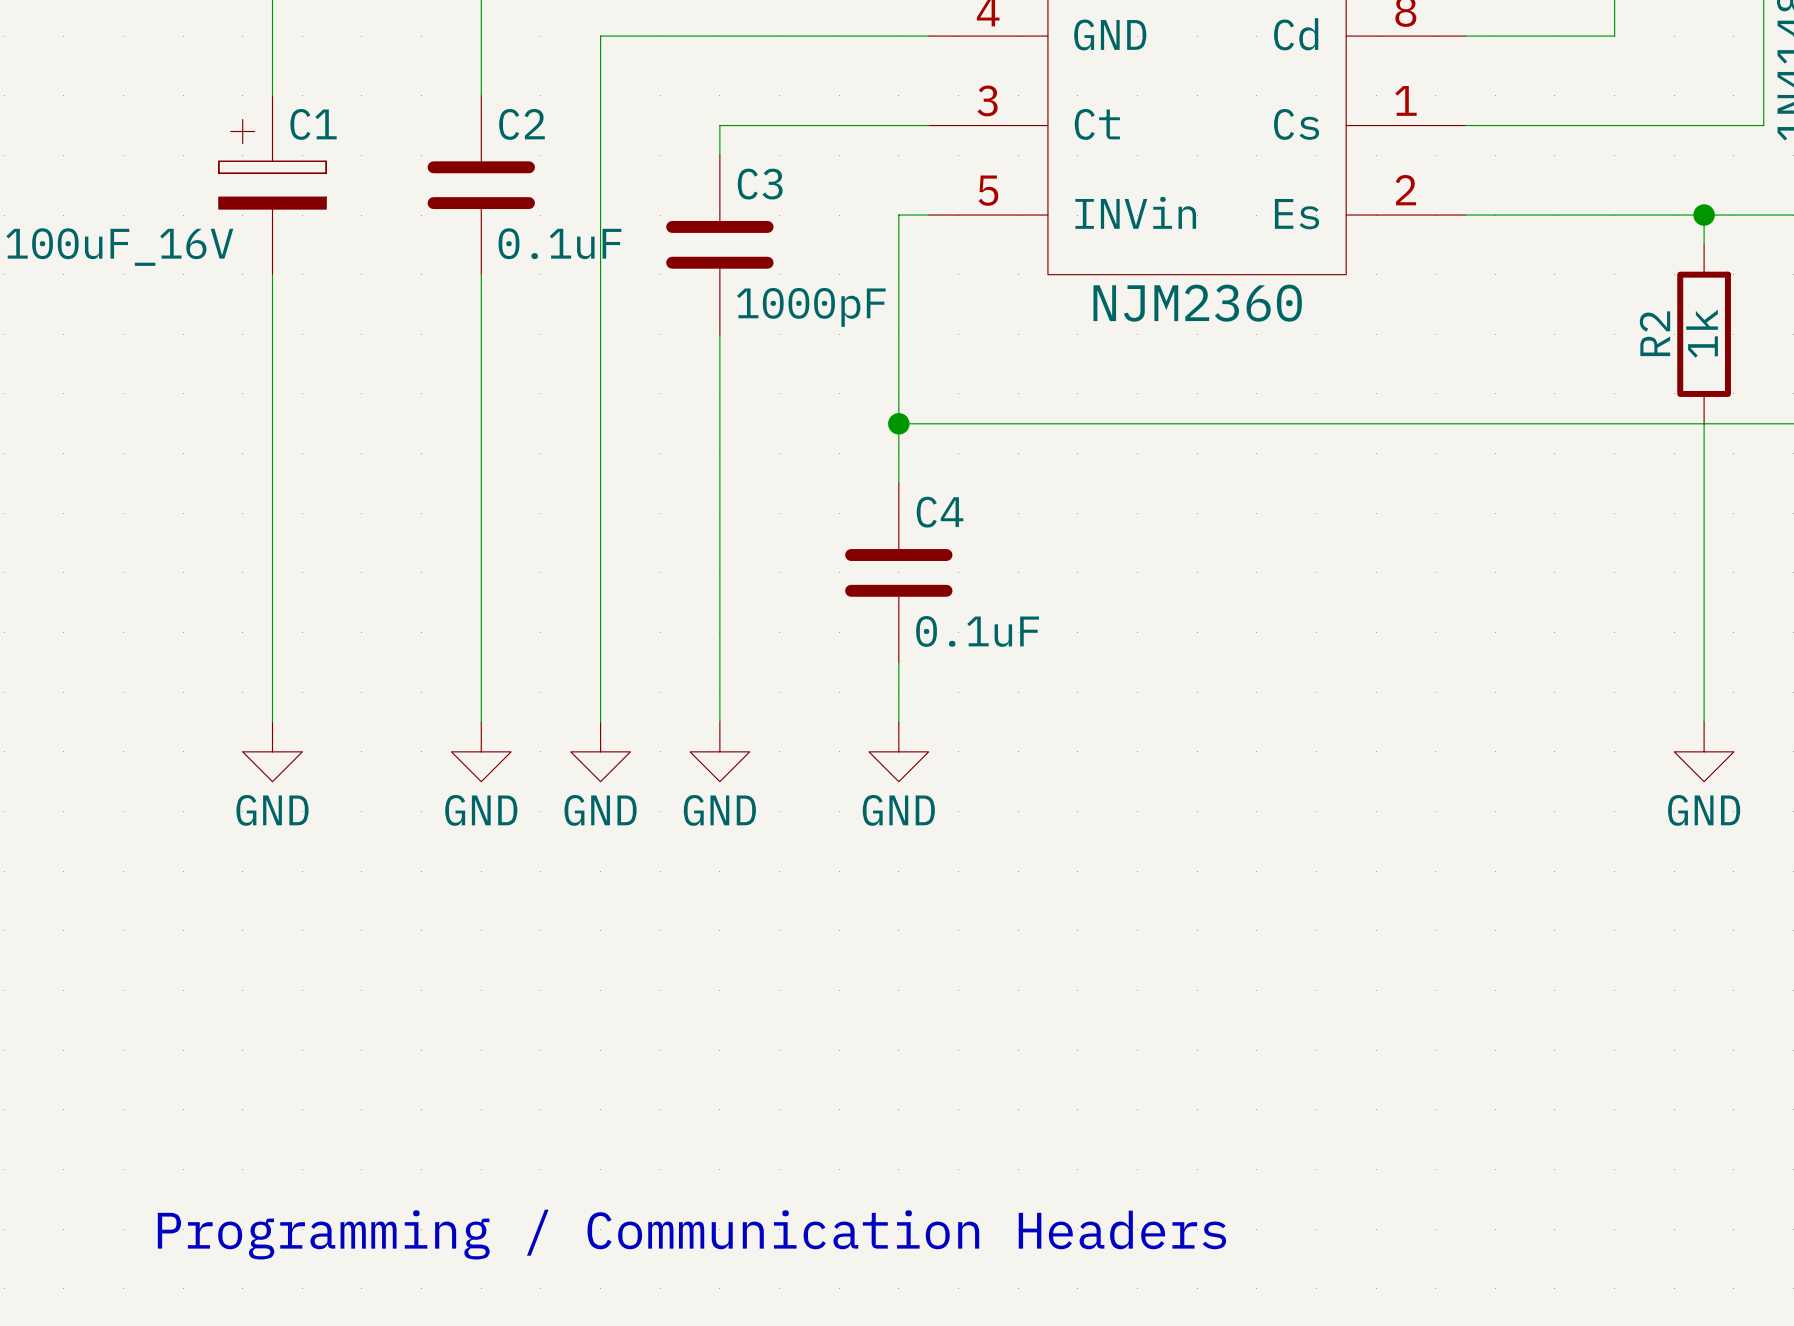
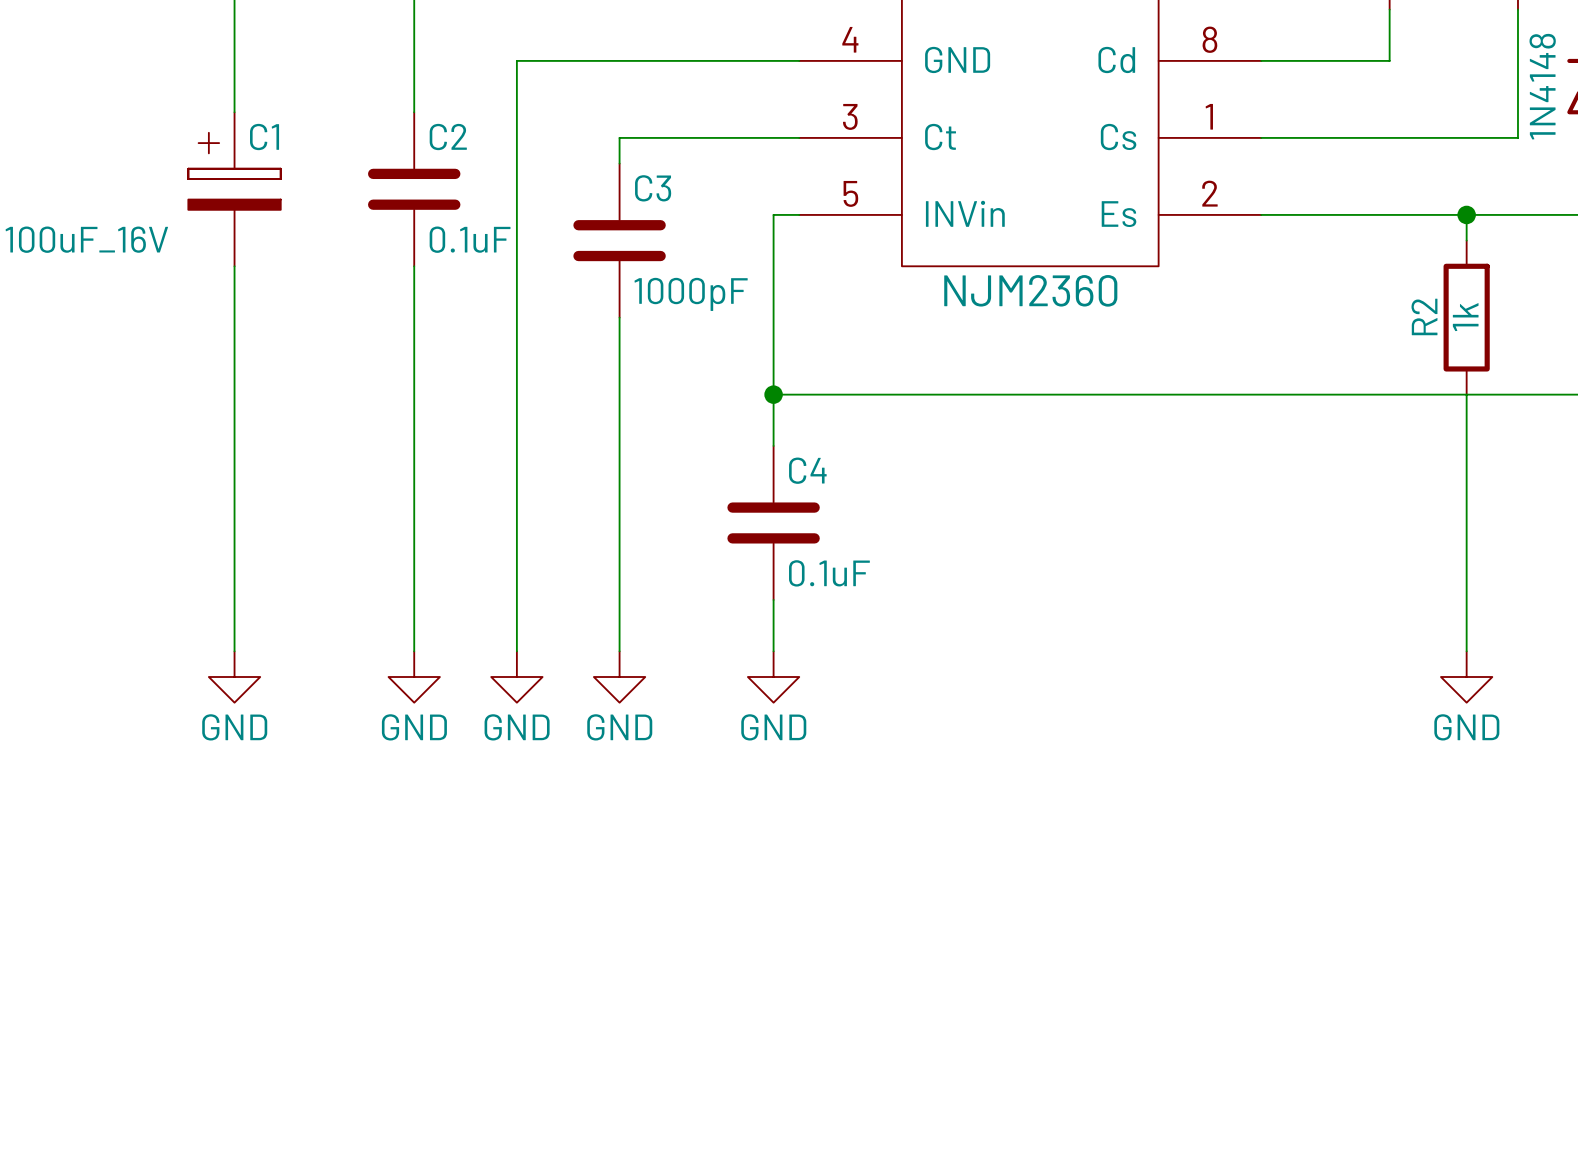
text: Programming / Communication Headers (691, 1234) -> none

